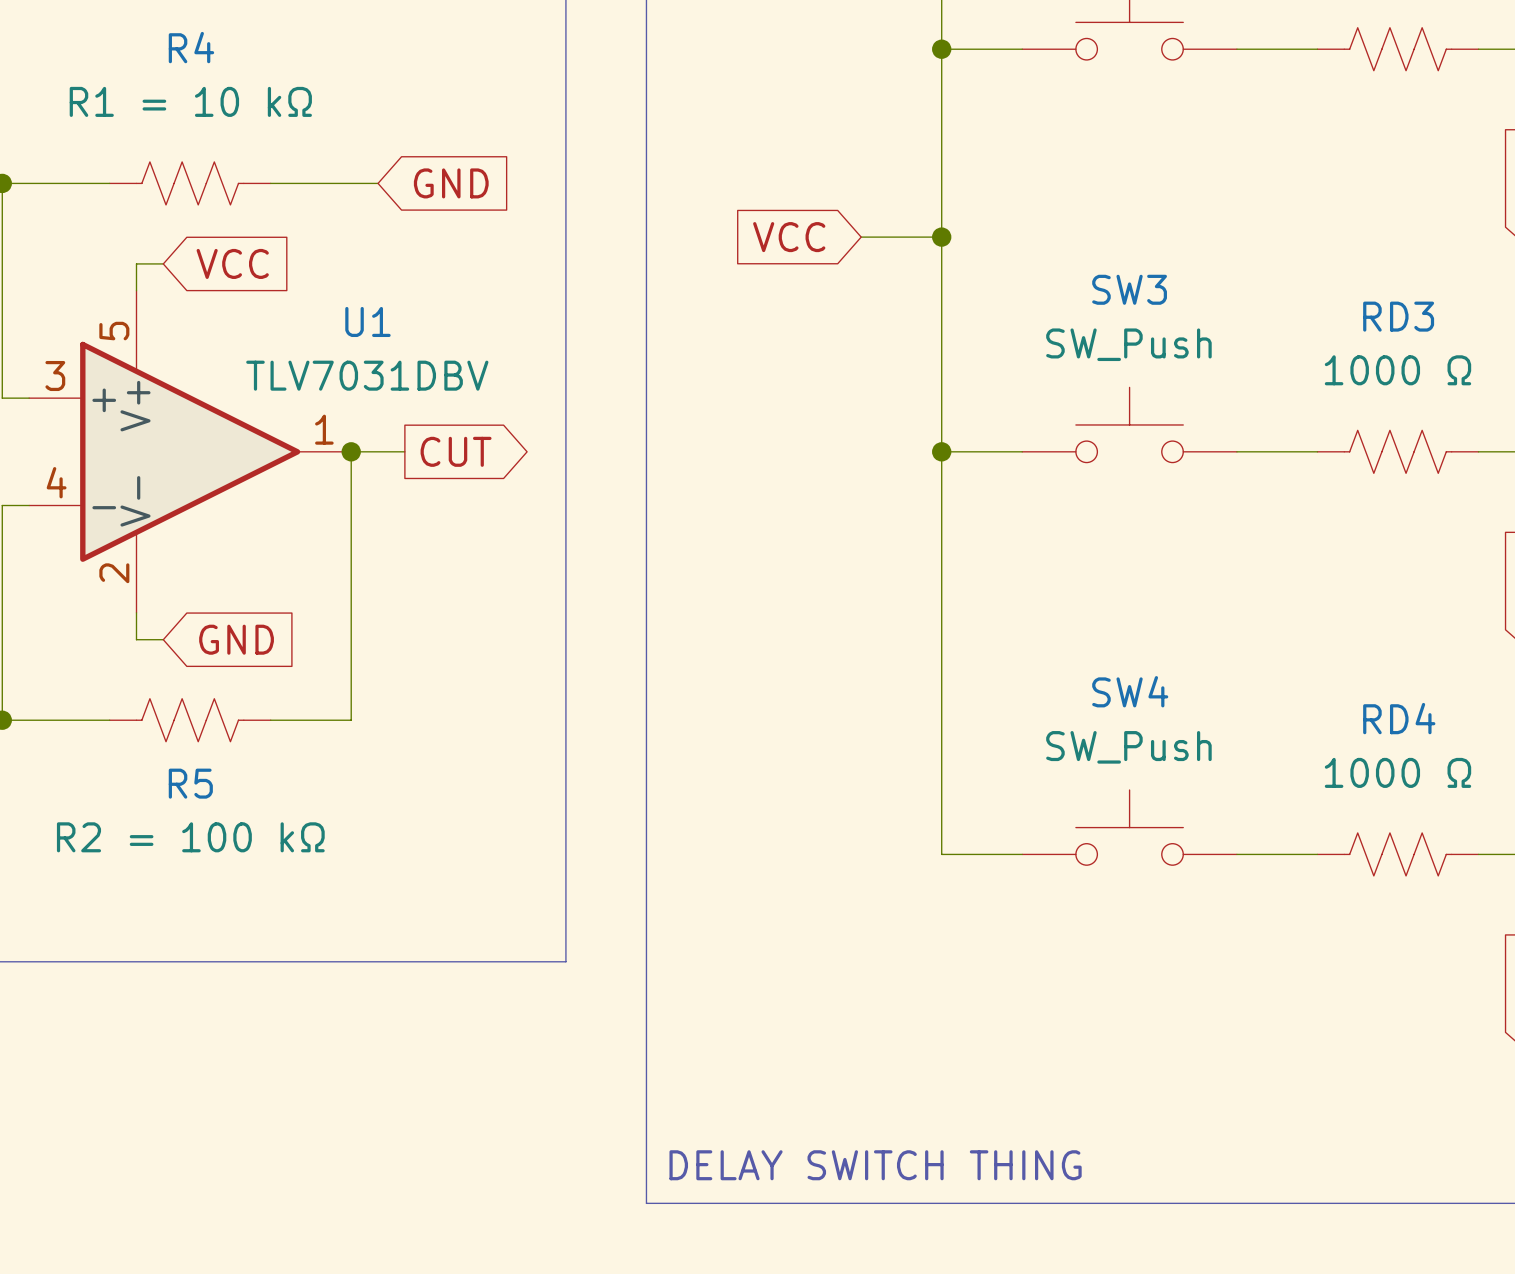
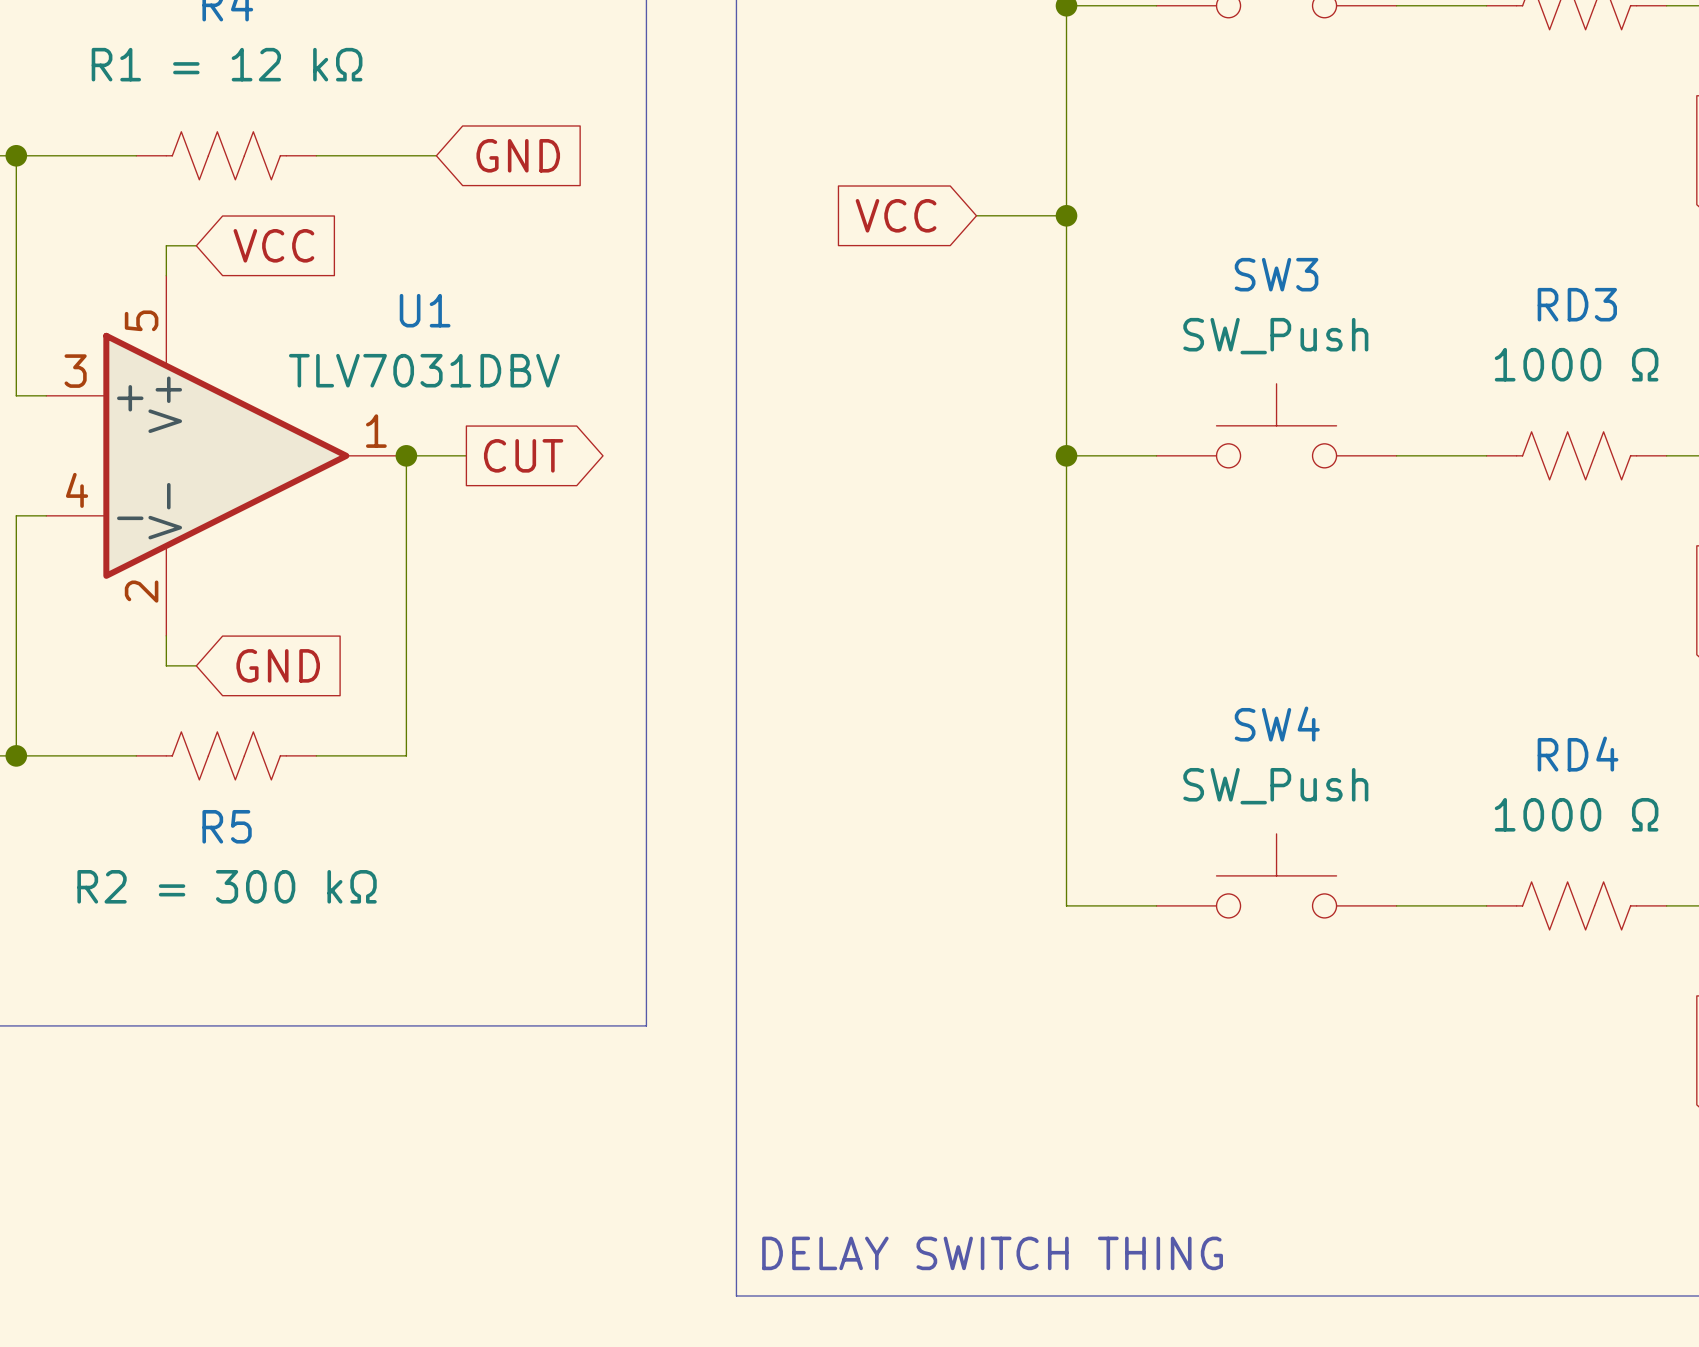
R4 value: R1 = 10 kΩ (190, 101) -> R1 = 12 kΩ (227, 64)
R5 value: R2 = 100 kΩ (190, 837) -> R2 = 300 kΩ (227, 886)

